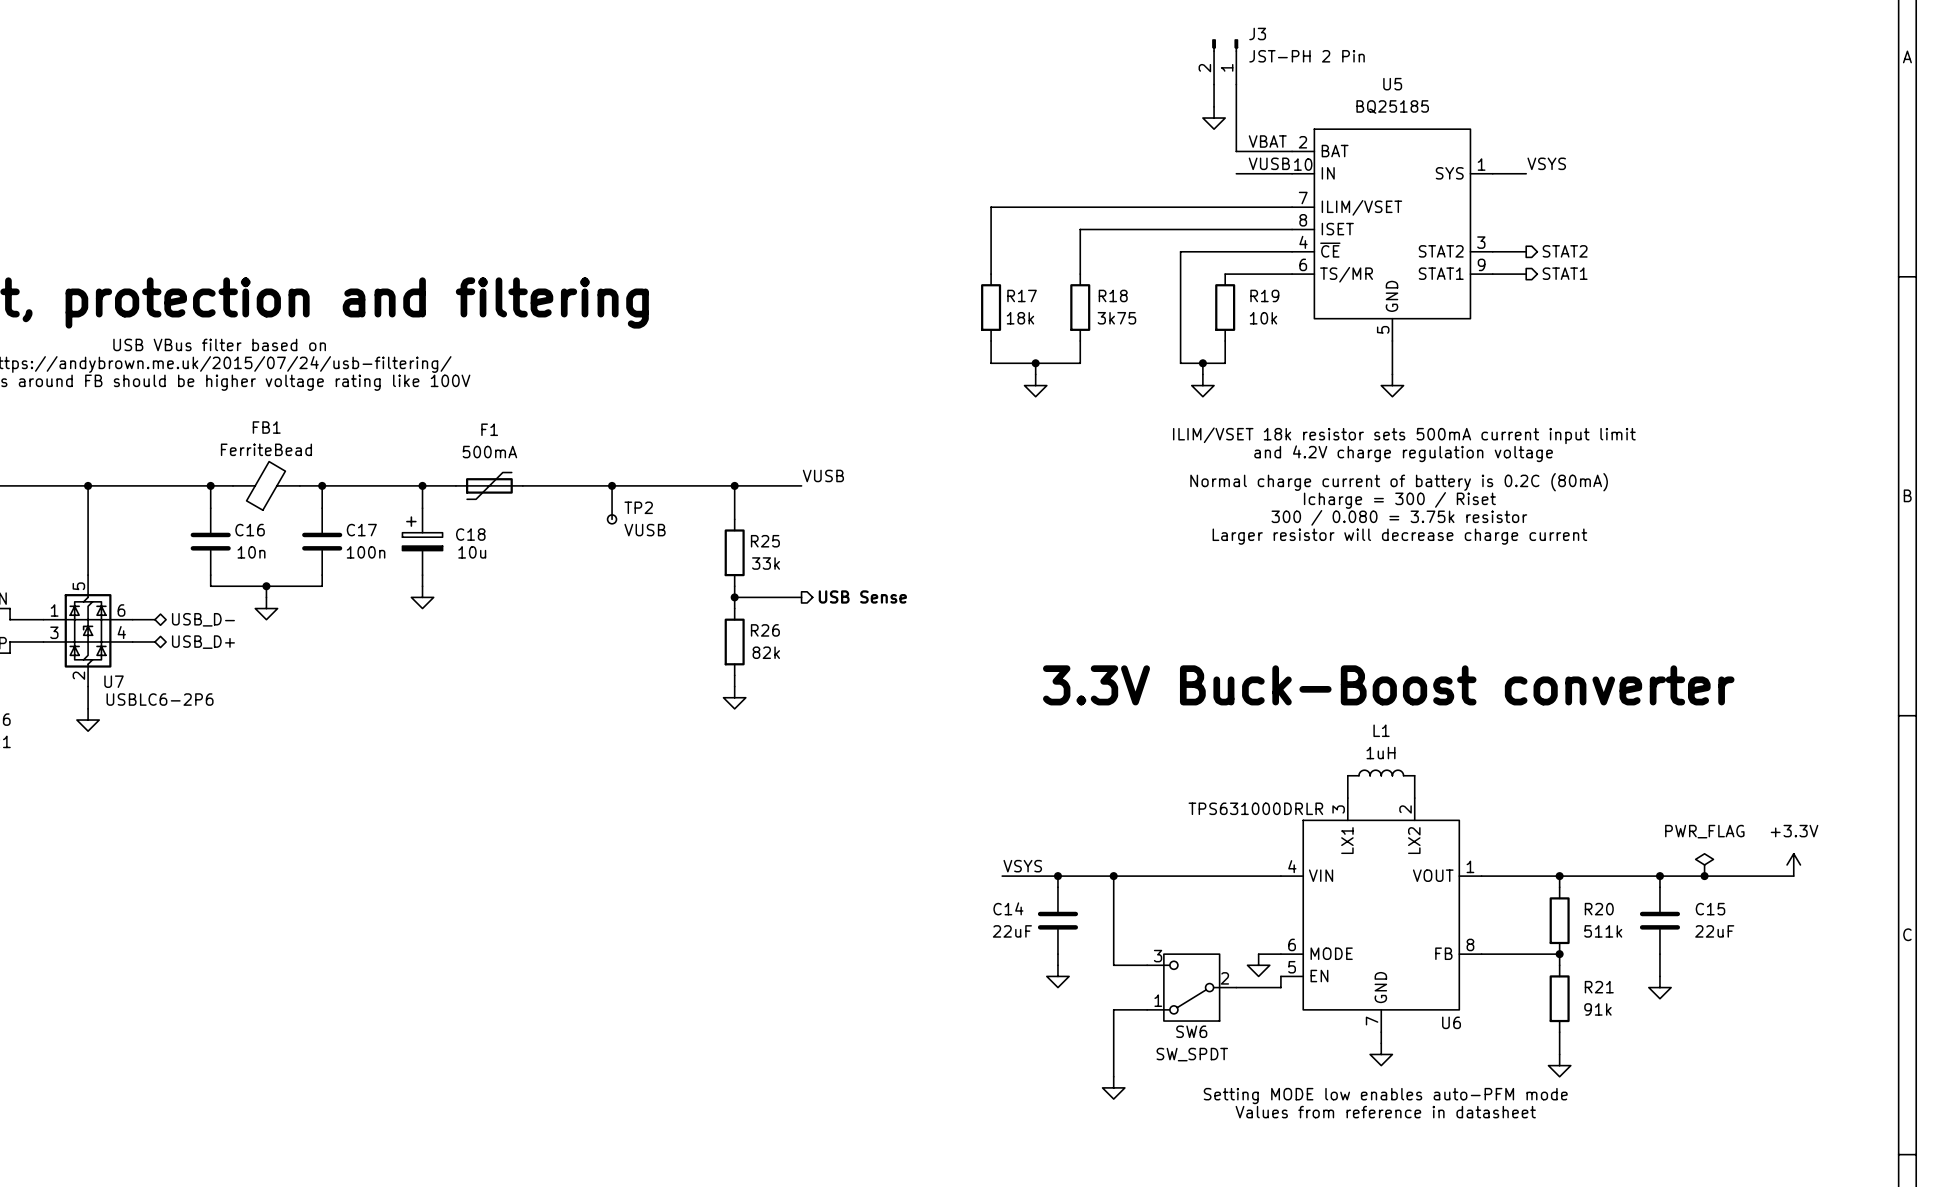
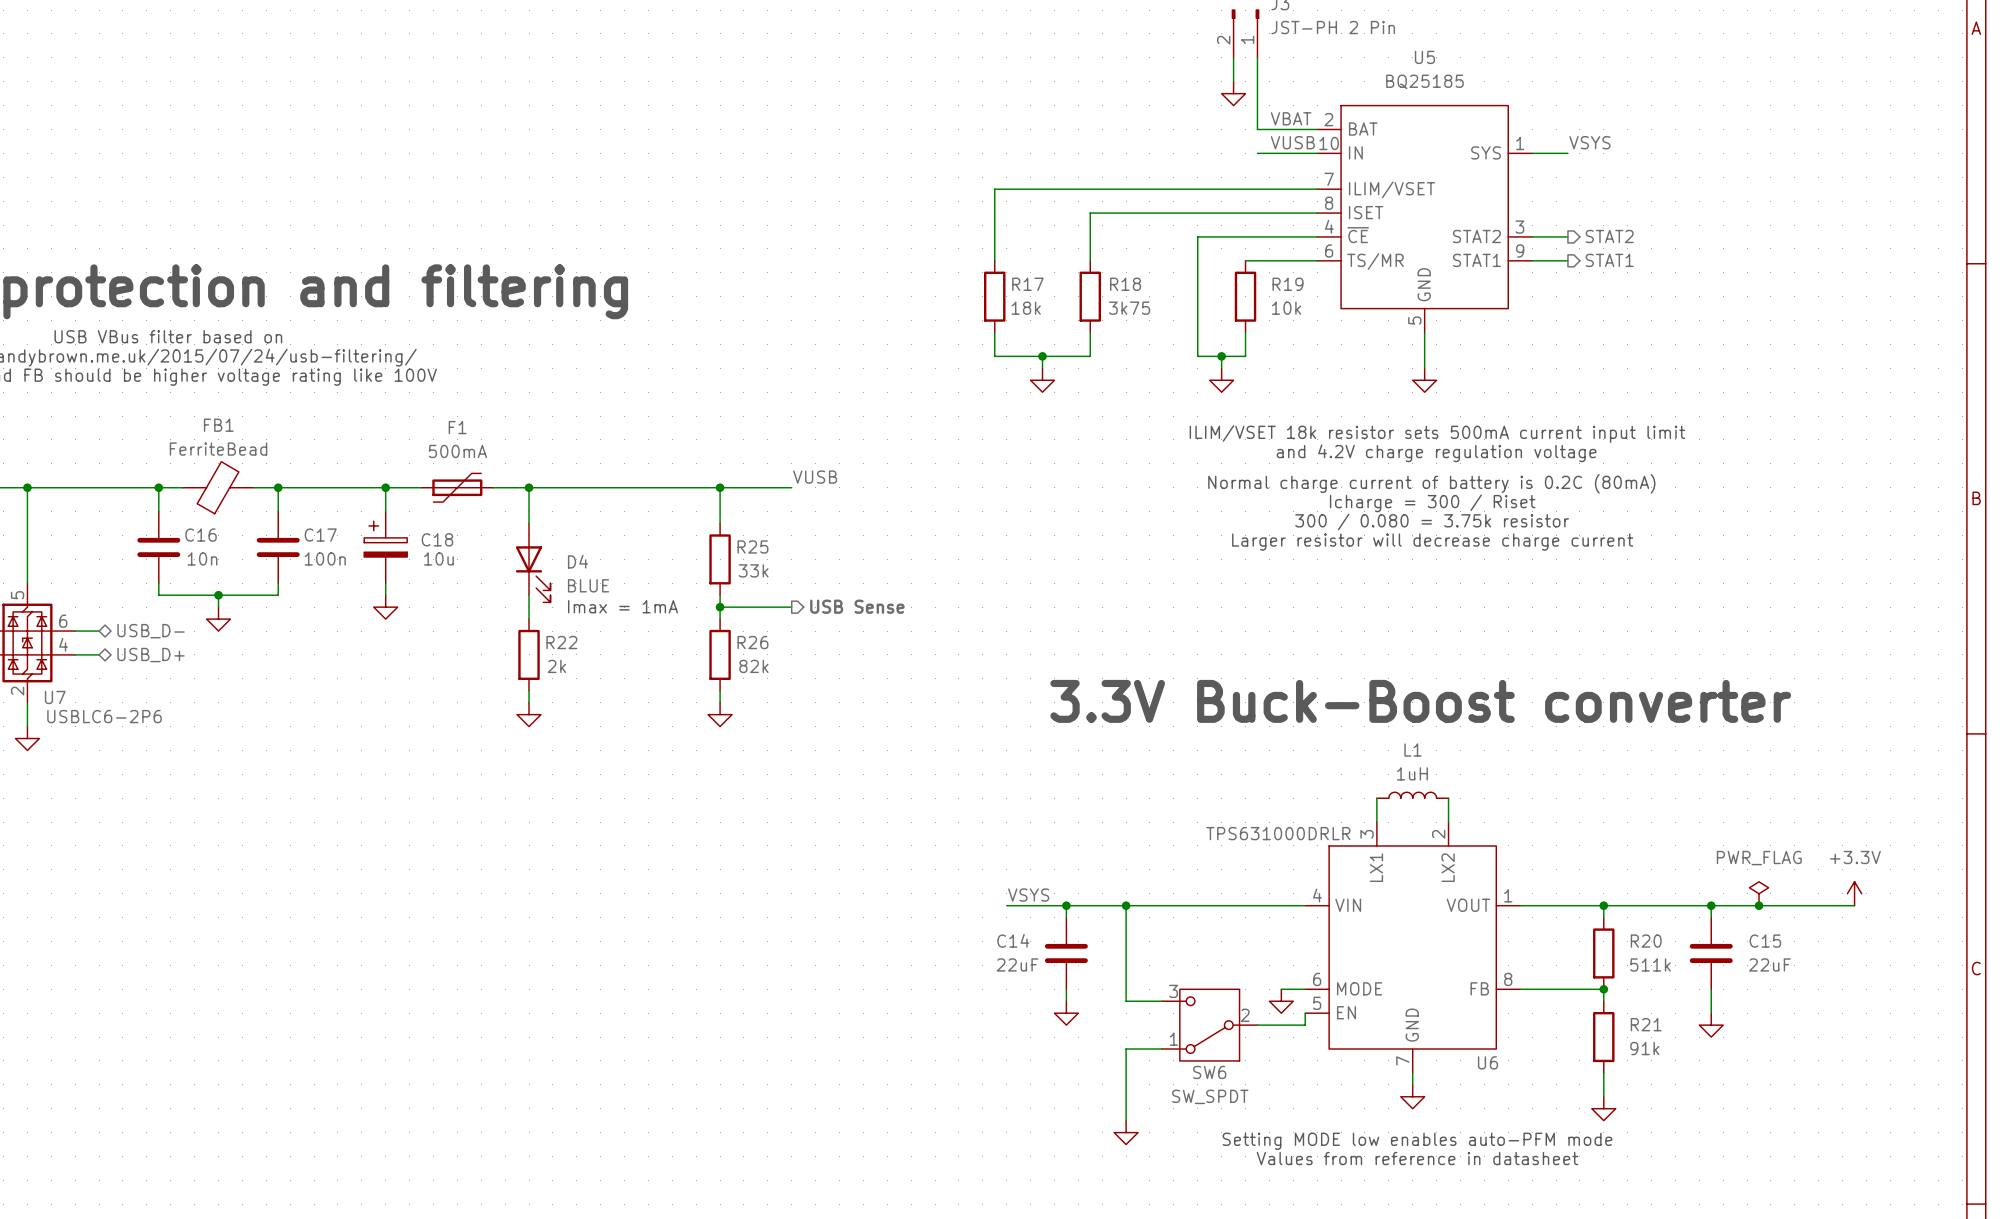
junction: none -> (529, 487)
wire: (612, 485) (612, 519) -> (529, 487) (529, 523)
junction: (612, 485) -> none
TP2: VUSB (612, 519) -> none
D4: none -> BLUE (533, 562)
wire: none -> (529, 595) (529, 619)
text: none -> Imax = 1mA (623, 606)
R22: none -> 2k (529, 654)
wire: none -> (529, 690) (529, 702)
power symbol: none -> (529, 714)

